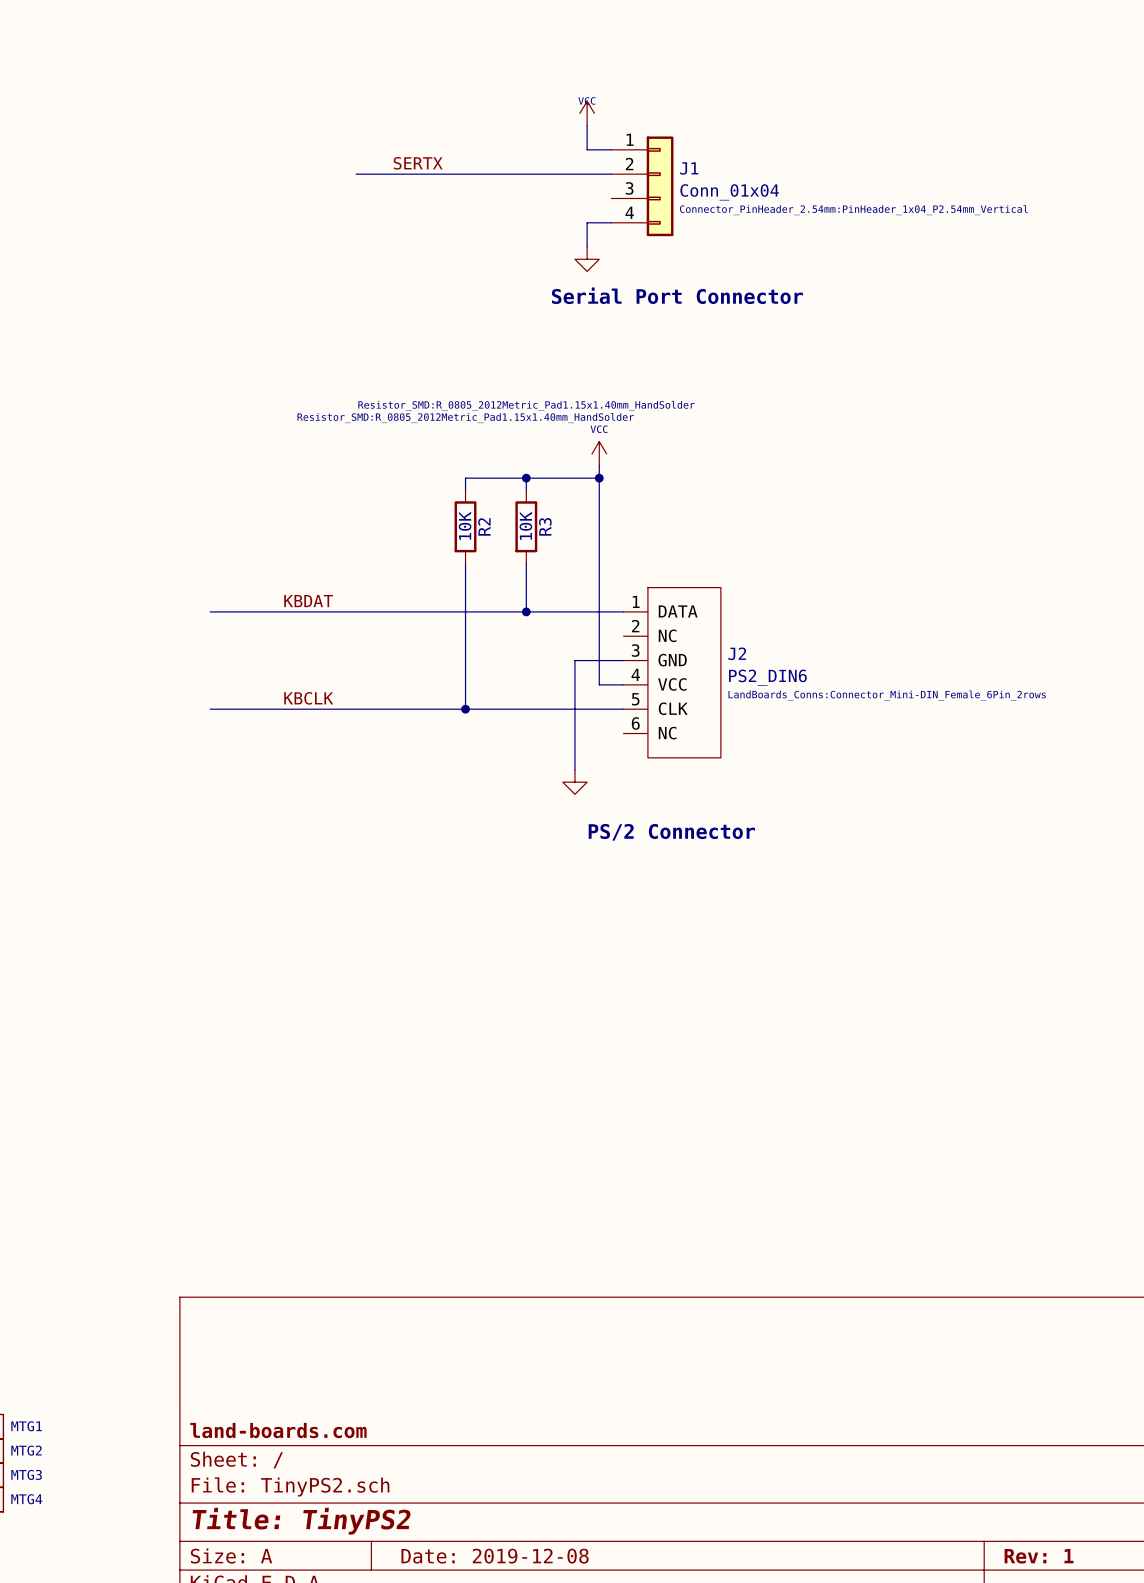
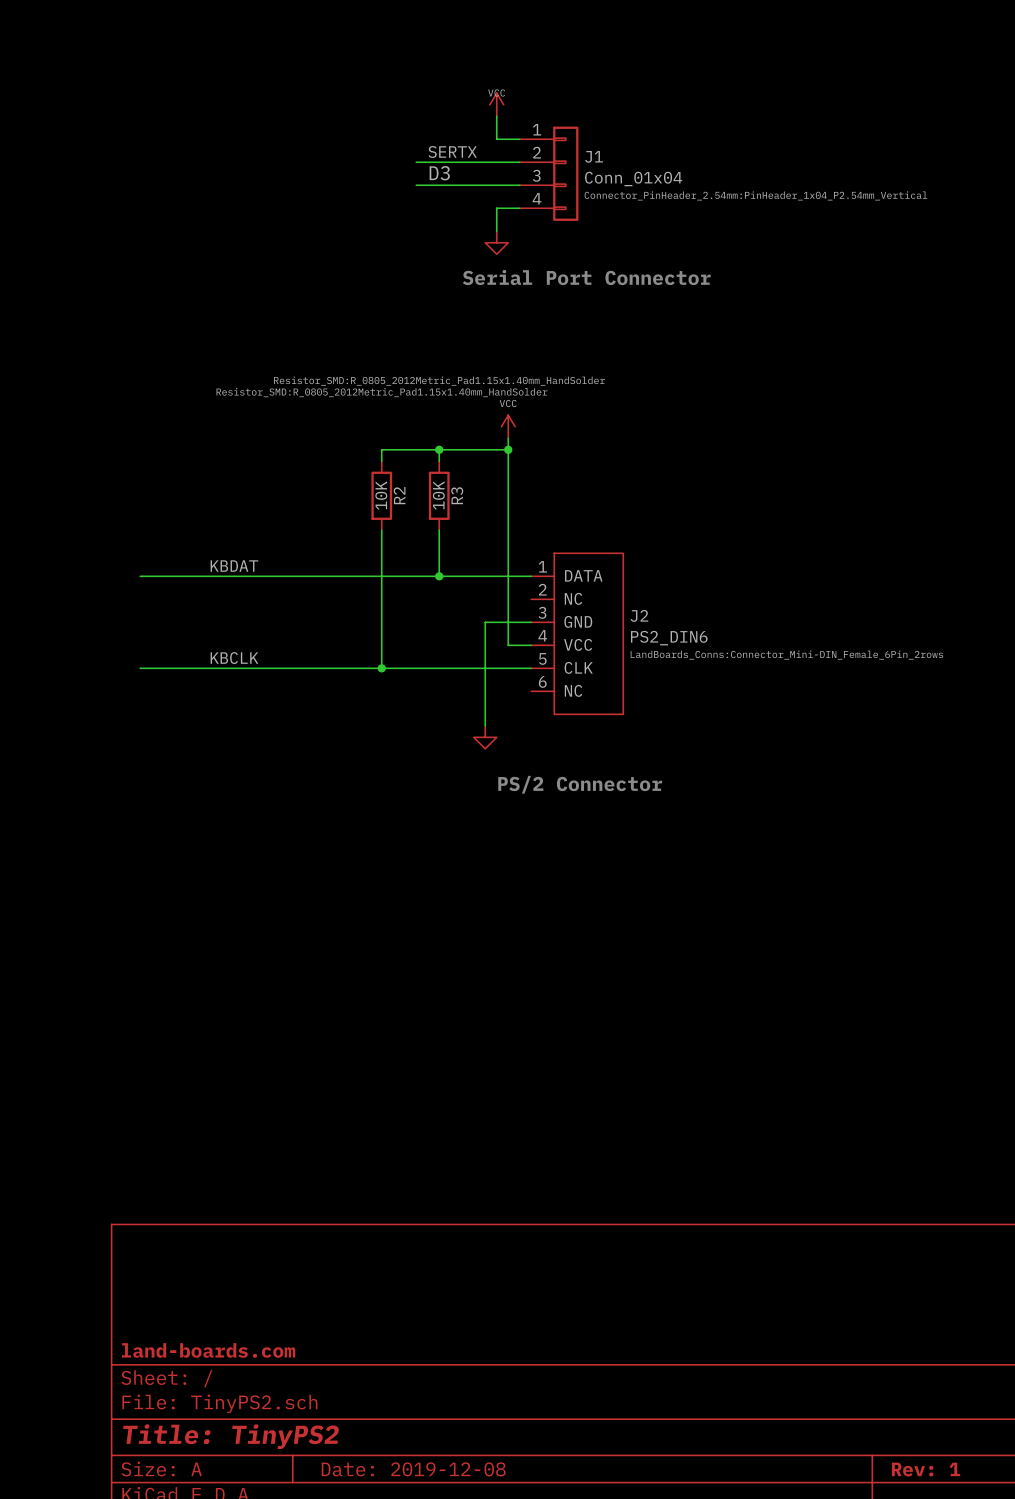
label position: SERTX (418, 163) -> SERTX (452, 151)
wire: (356, 174) (502, 174) -> none
label: none -> D3 (439, 173)
wire: none -> (416, 185) (519, 185)

